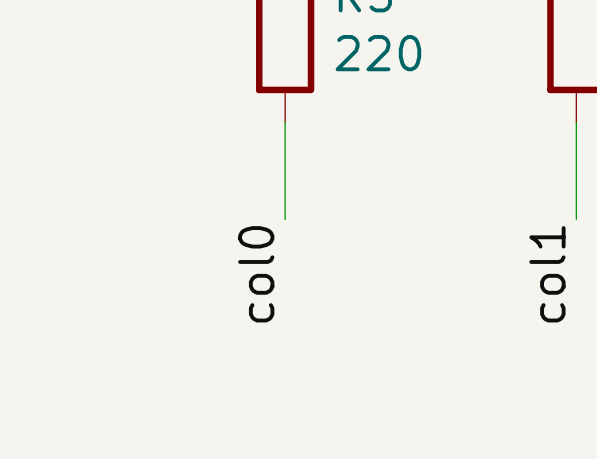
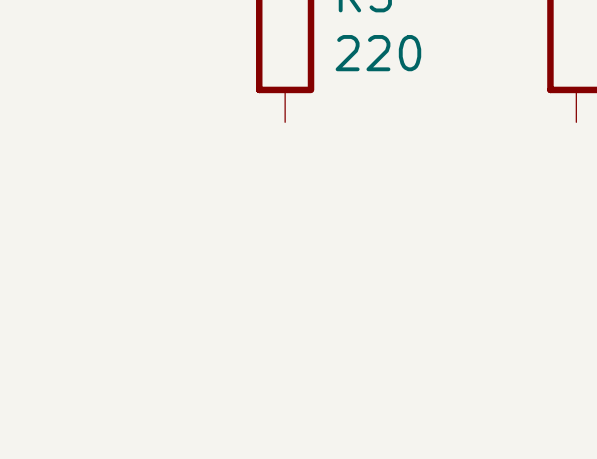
wire: (285, 122) (285, 219) -> none
wire: (576, 122) (576, 219) -> none
label: col0 (256, 274) -> none
label: col1 (547, 274) -> none

